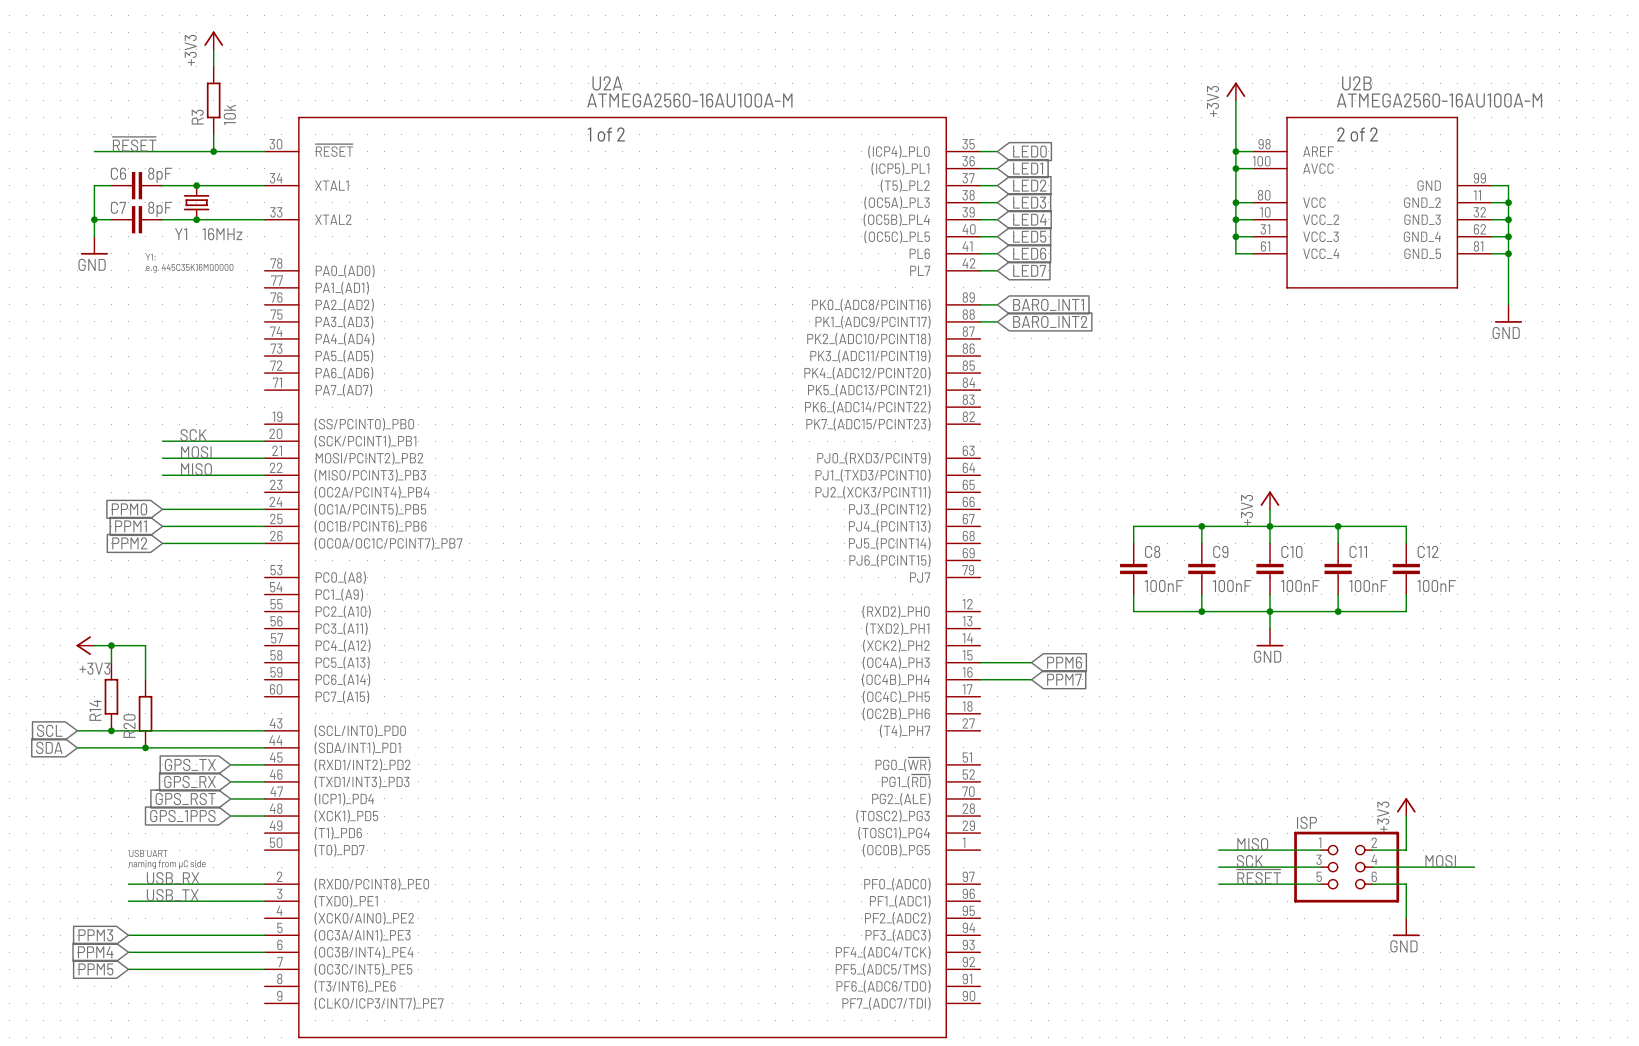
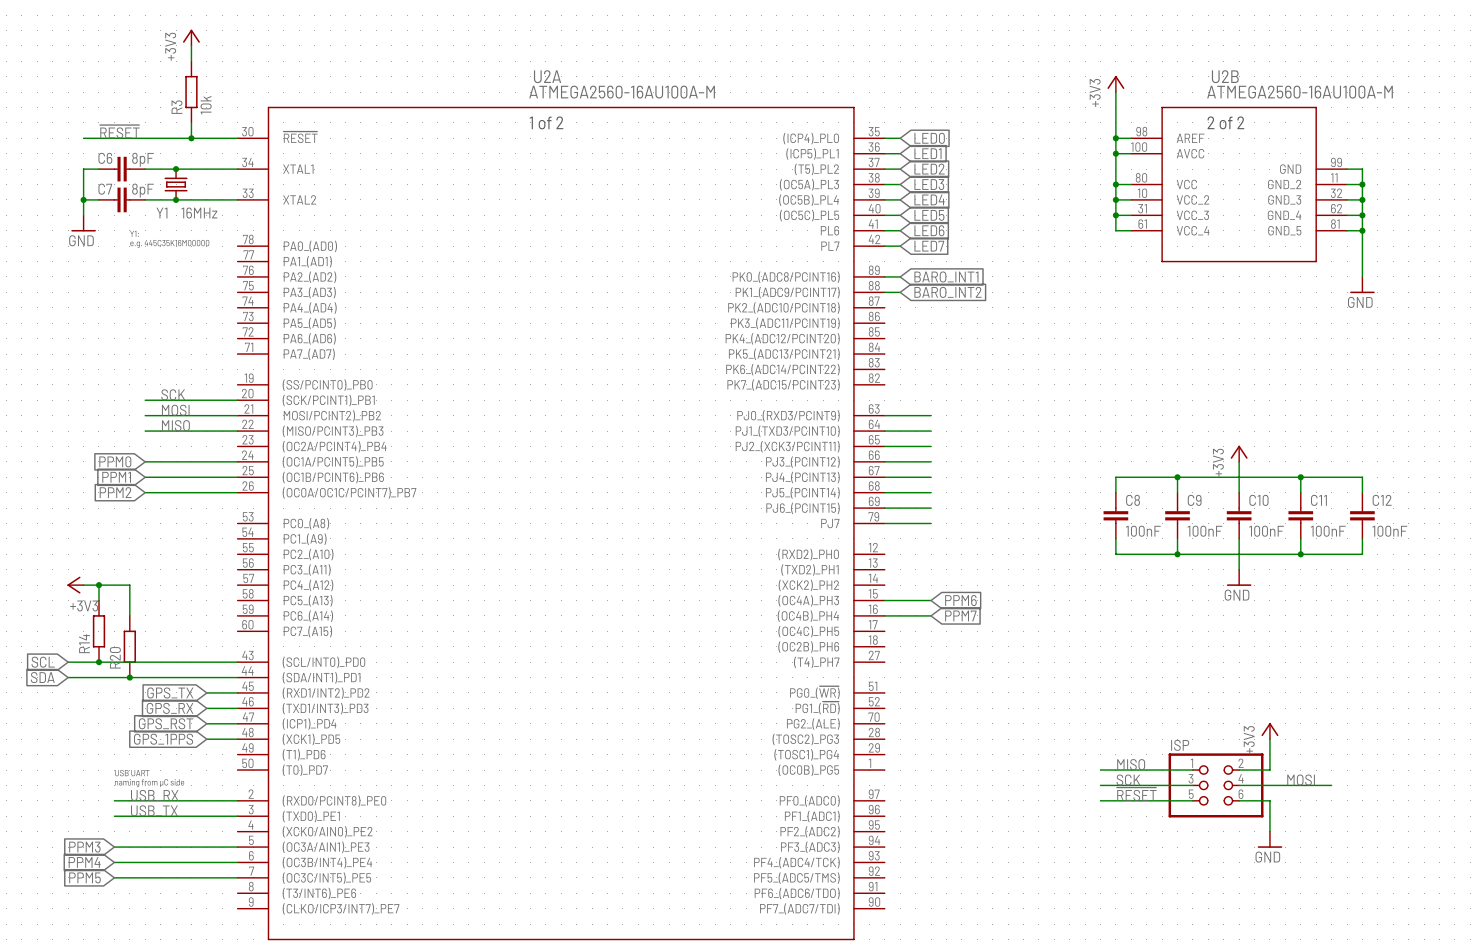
wire: none -> (884, 415) (931, 415)
wire: none -> (884, 431) (931, 431)
wire: none -> (884, 446) (931, 446)
power symbol position: +3V3 (1269, 500) -> +3V3 (1239, 453)
wire: none -> (884, 461) (931, 461)
wire: (1269, 509) (1269, 543) -> (1239, 461) (1239, 492)
wire: none -> (884, 477) (931, 477)
wire: (1201, 526) (1201, 543) -> (1177, 477) (1177, 492)
junction: (1201, 526) -> none
wire: (1235, 526) (1133, 526) (1133, 543) -> (1115, 477) (1115, 492)
junction: (1269, 526) -> none
junction: none -> (1177, 477)
wire: (1338, 526) (1338, 543) -> (1300, 477) (1300, 492)
junction: (1338, 526) -> none
wire: (1406, 526) (1406, 543) -> (1269, 477) (1362, 477) (1362, 492)
junction: none -> (1300, 477)
wire: none -> (884, 492) (931, 492)
wire: none -> (884, 508) (931, 508)
C8 position: (1133, 568) -> (1115, 515)
C9 position: (1201, 568) -> (1177, 515)
C10 position: (1269, 568) -> (1239, 515)
C11 position: (1338, 568) -> (1300, 515)
C12 position: (1406, 568) -> (1362, 515)
wire: none -> (884, 523) (931, 523)
wire: (1133, 594) (1133, 611) (1235, 611) -> (1115, 538) (1115, 554)
wire: (1201, 594) (1201, 611) -> (1177, 538) (1177, 554)
wire: (1269, 594) (1269, 628) -> (1239, 538) (1239, 569)
wire: (1338, 594) (1338, 611) -> (1300, 538) (1300, 554)
wire: (1406, 594) (1406, 611) -> (1362, 538) (1362, 554) (1269, 554)
junction: (1201, 611) -> none
junction: (1269, 611) -> none
junction: none -> (1177, 554)
junction: (1338, 611) -> none
junction: none -> (1300, 554)
power symbol position: GND (1269, 637) -> GND (1239, 577)

